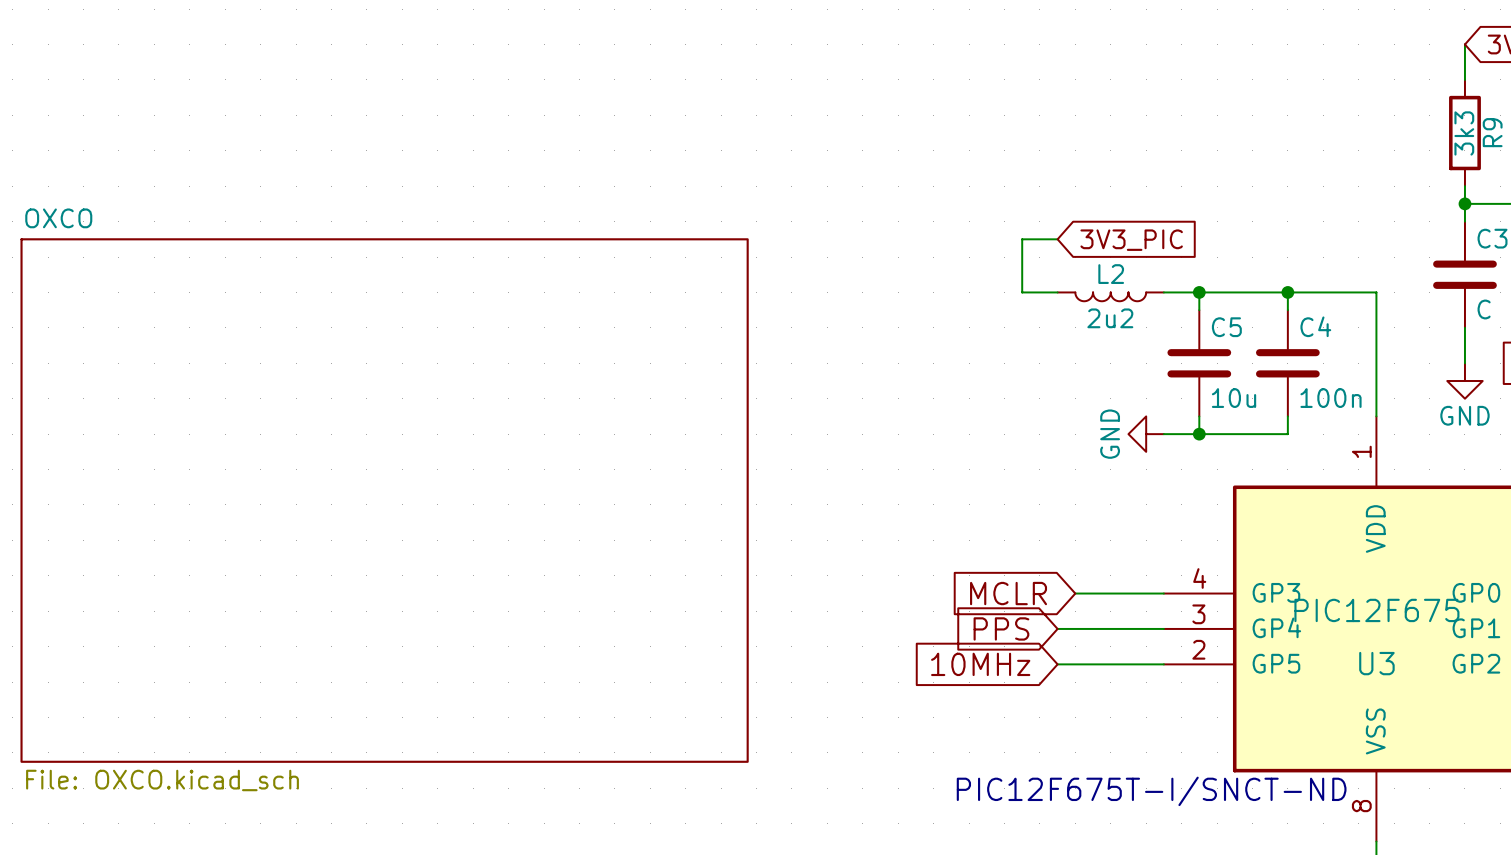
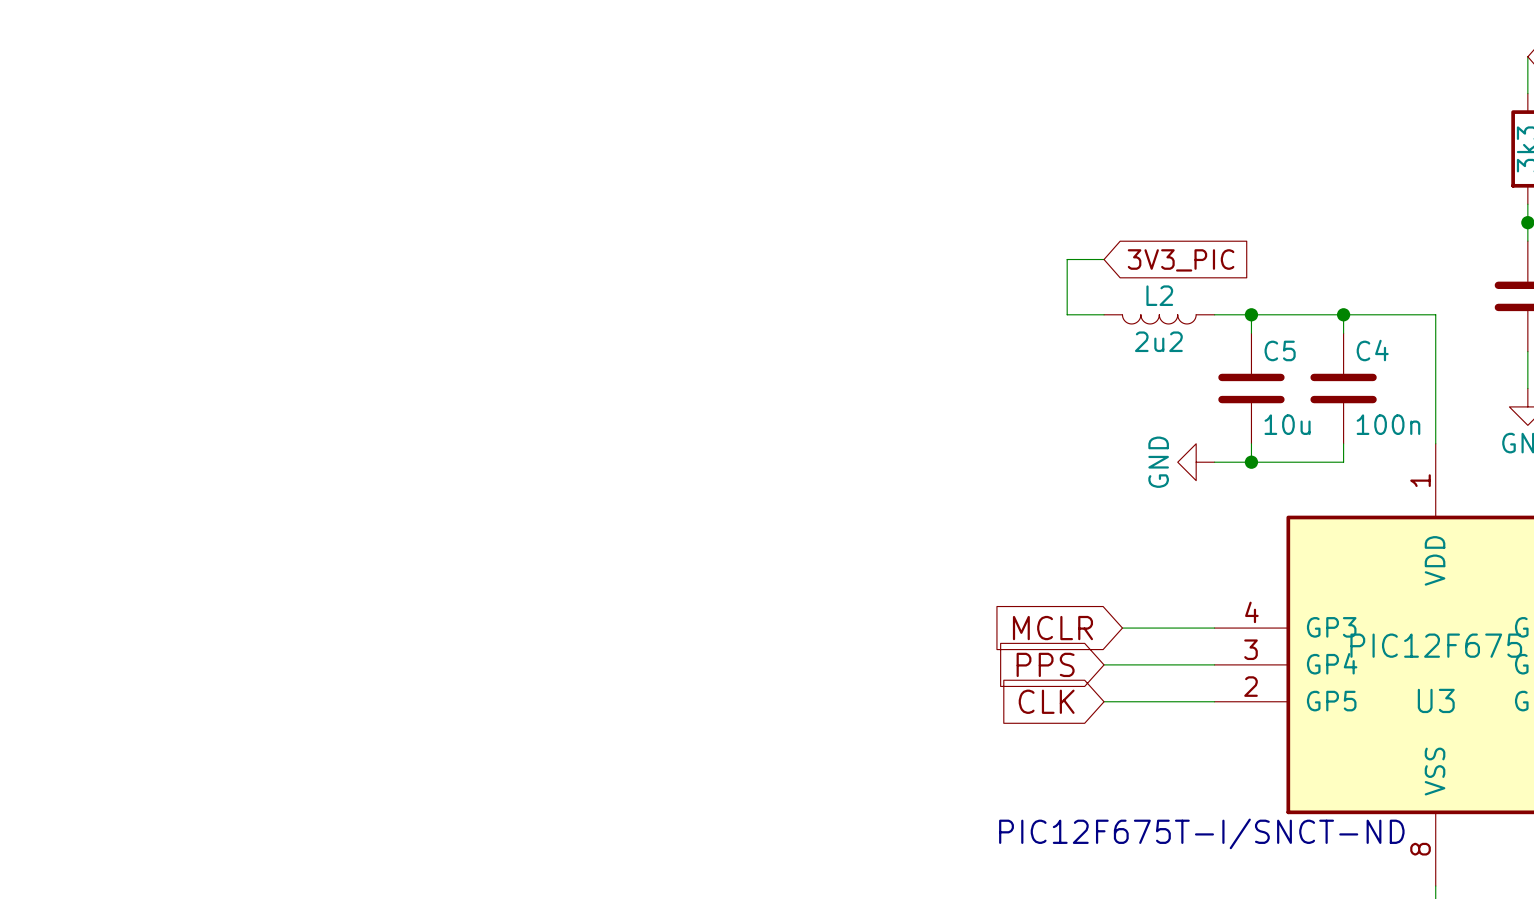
sheet OXCO: File: OXCO.kicad_sch (384, 500) -> none
global label: 10MHz (980, 664) -> CLK (1046, 701)

